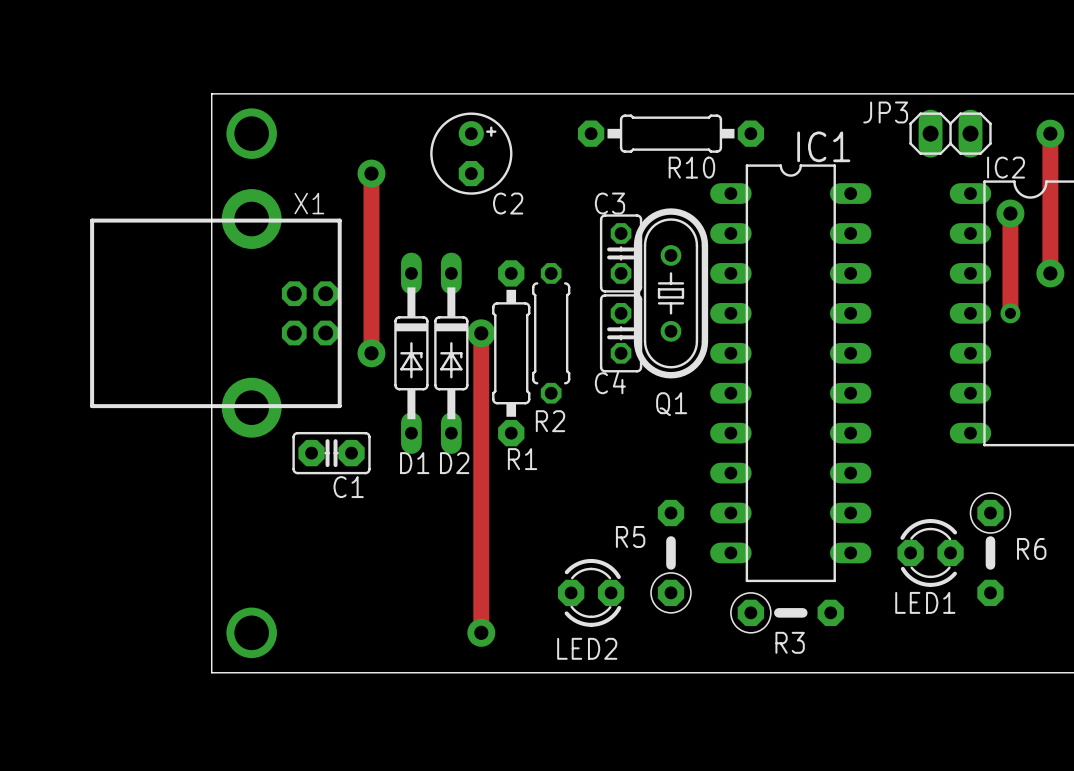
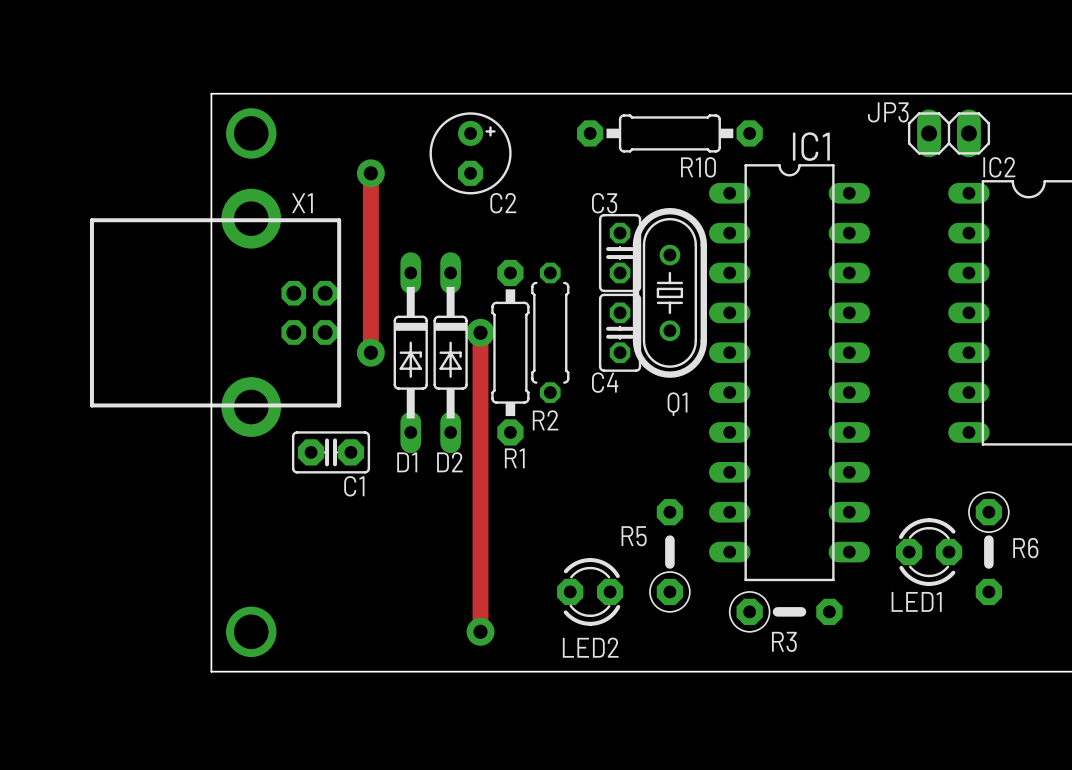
track: (1050, 133) (1050, 273) -> none
via: (1050, 133) -> none
track: (1010, 213) (1010, 313) -> none
via: (1010, 213) -> none
via: (1050, 273) -> none
via: (1010, 313) -> none

